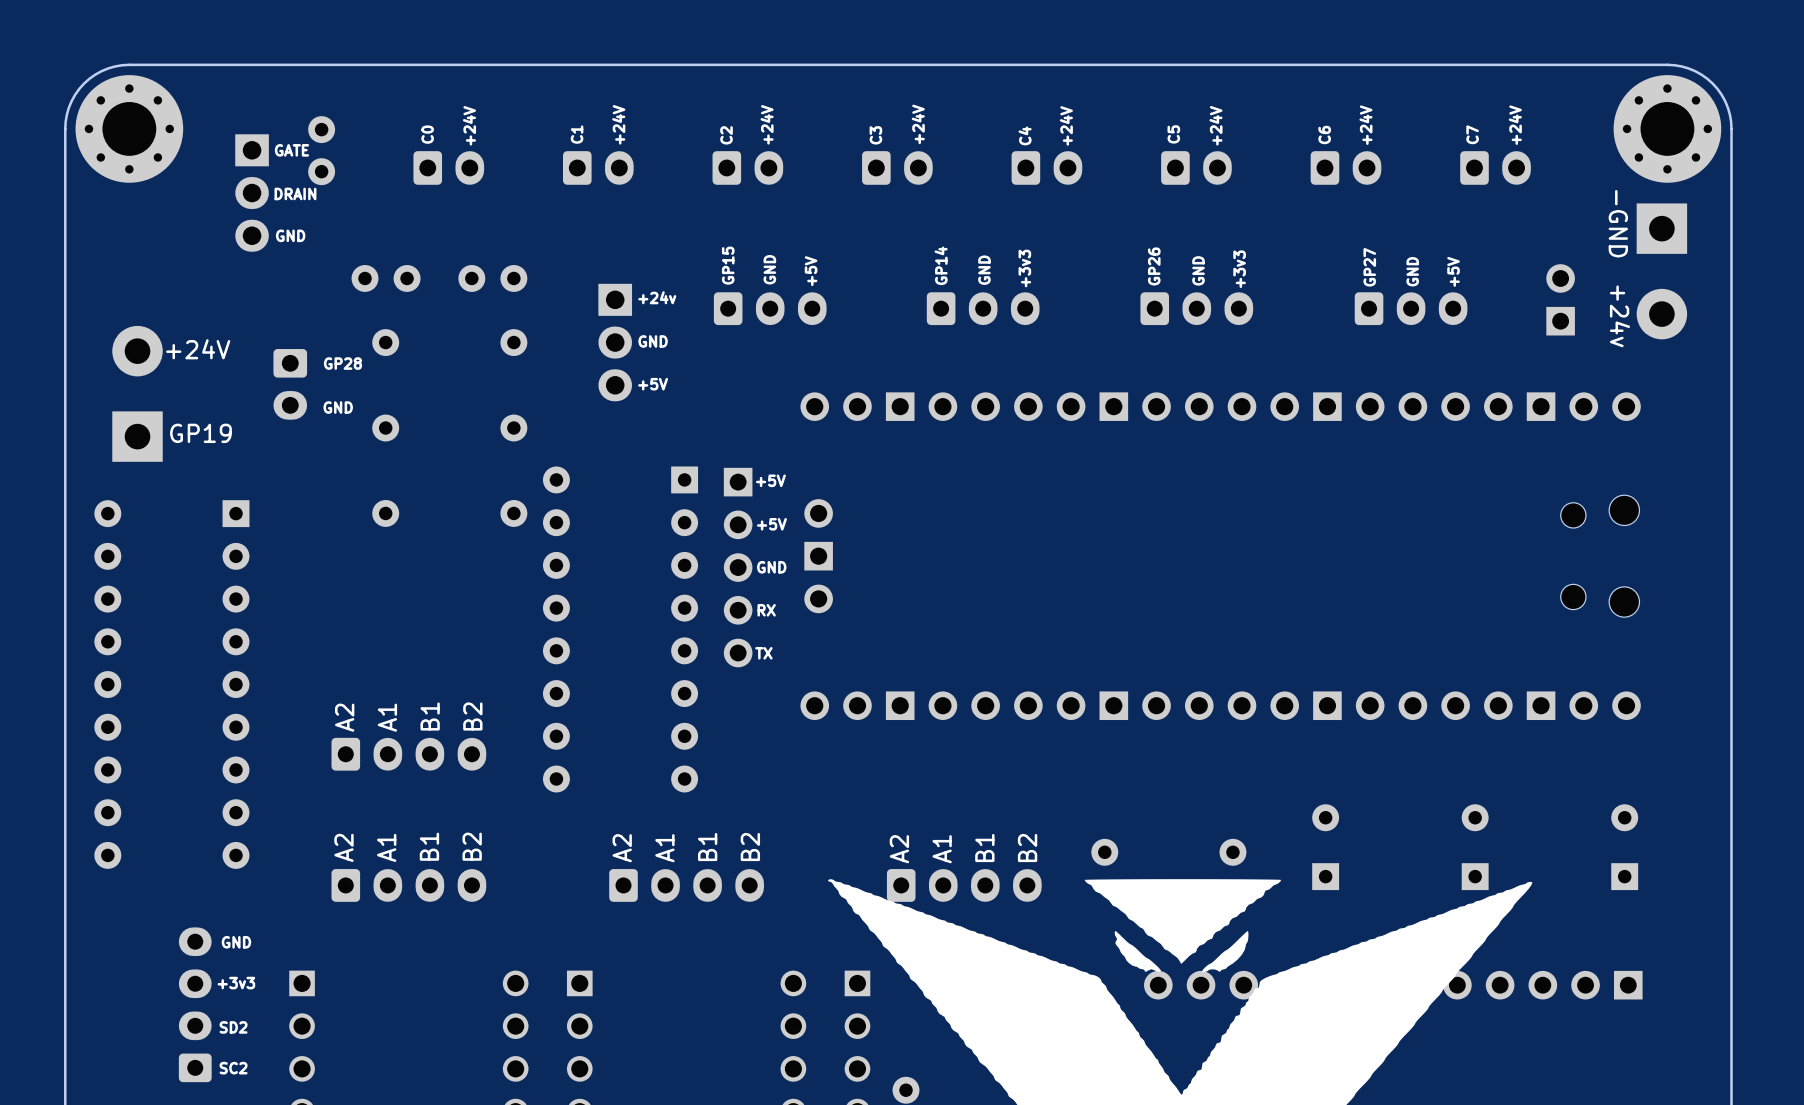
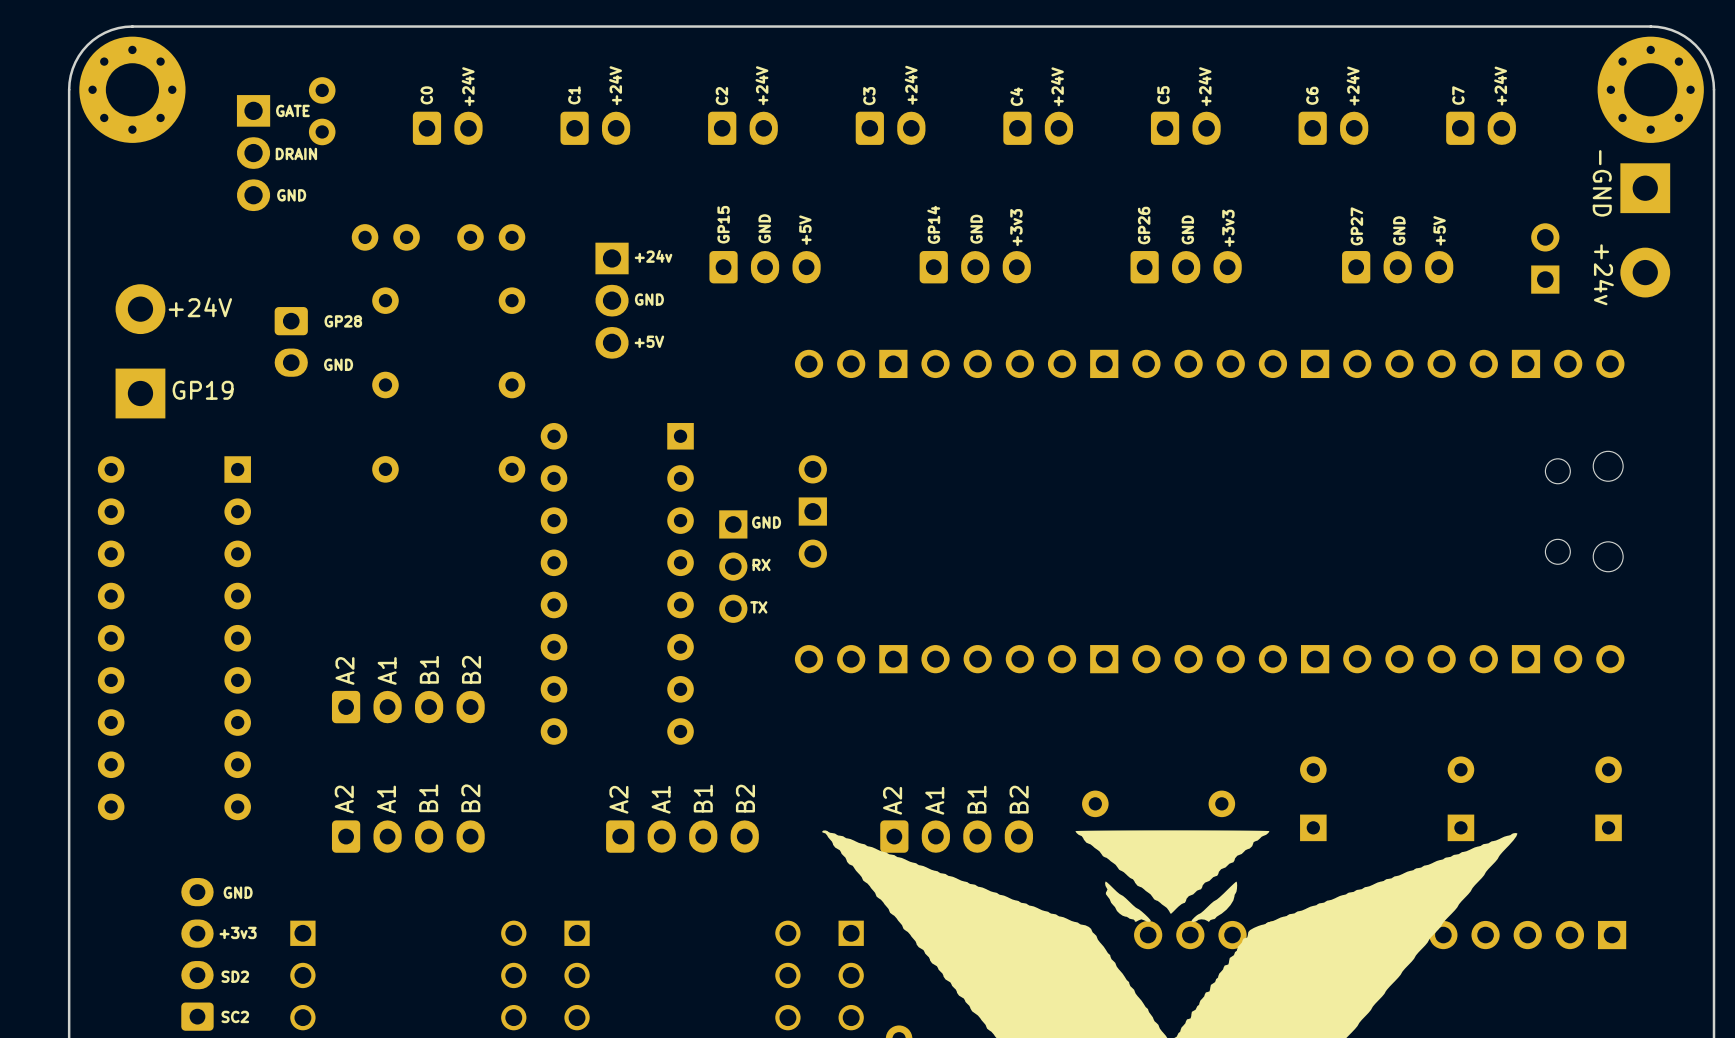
text: +5V (770, 480) -> none
text: +5V (771, 524) -> none
part: (738, 567) -> none
part: none -> (733, 566)

